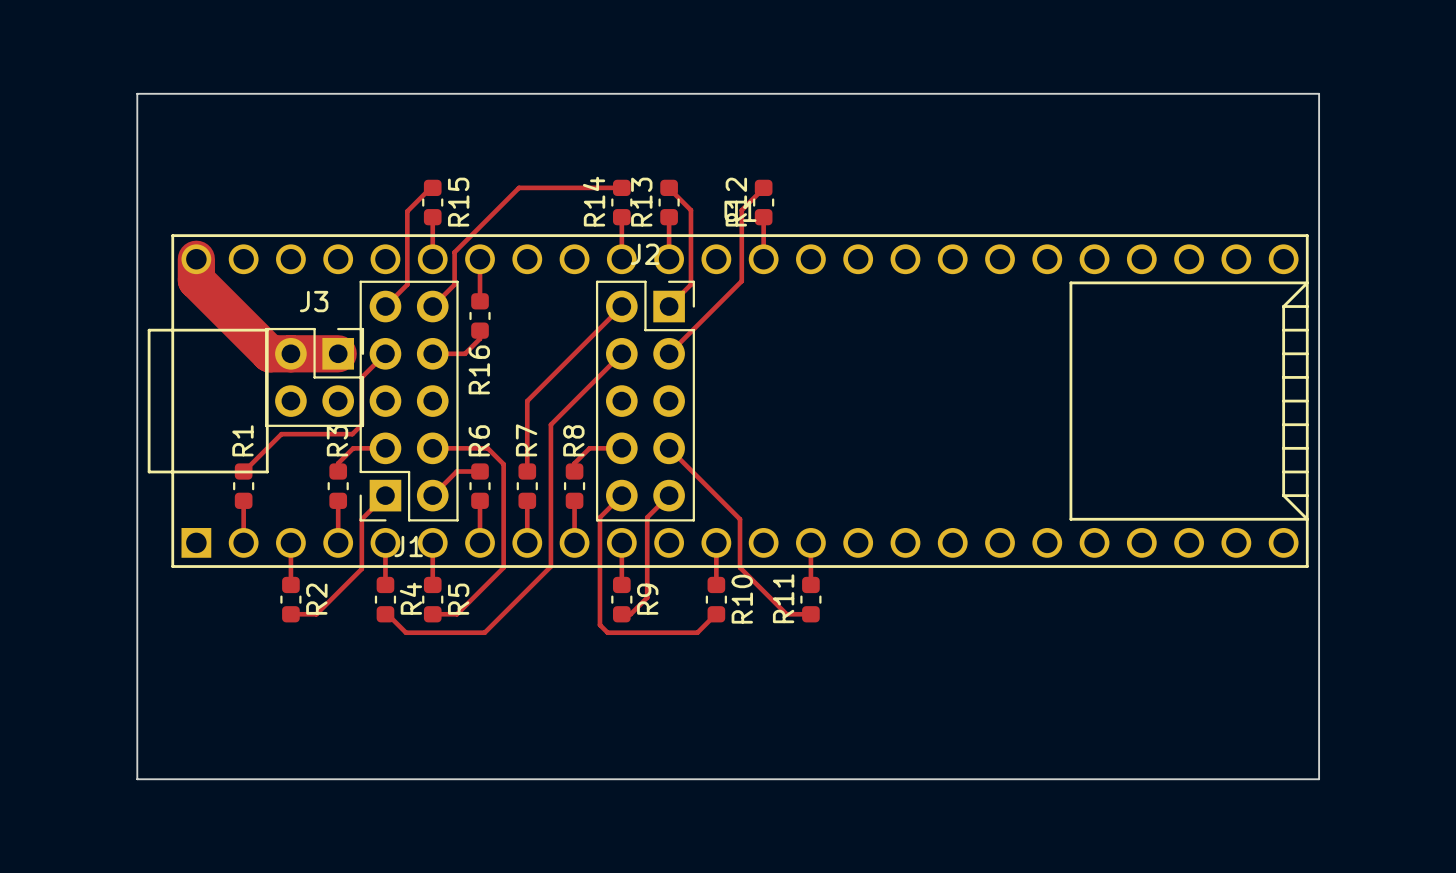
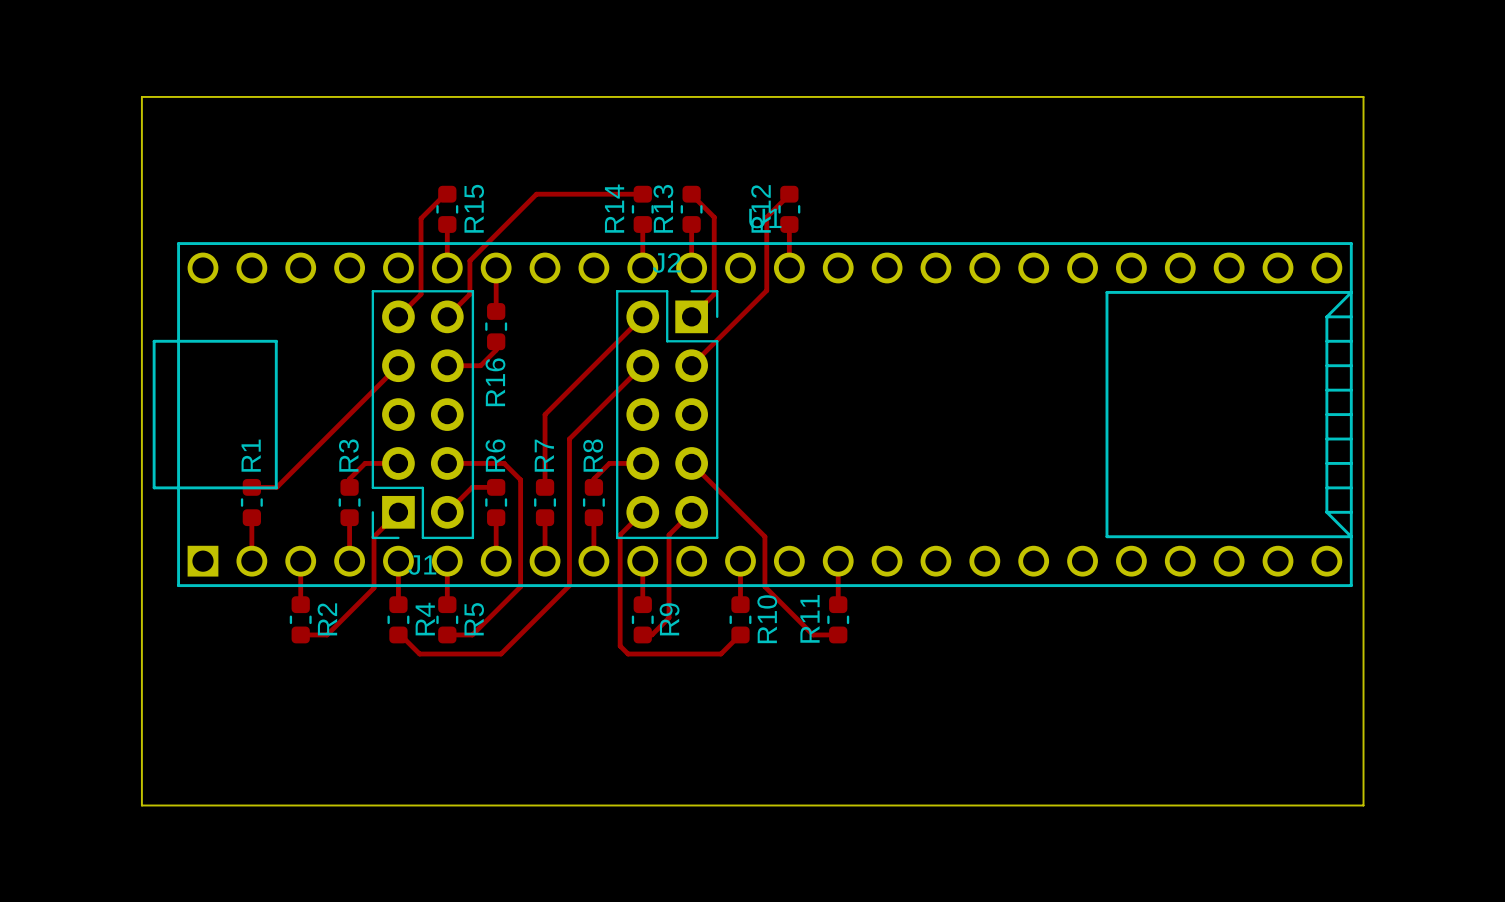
track: (196, 259) (196, 280) (269, 353) (338, 353) -> none
J3: (314, 377) -> none
track: (361, 377) (361, 424) (352, 434) (281, 434) (243, 471) -> (374, 390) (276, 487) (251, 487)

